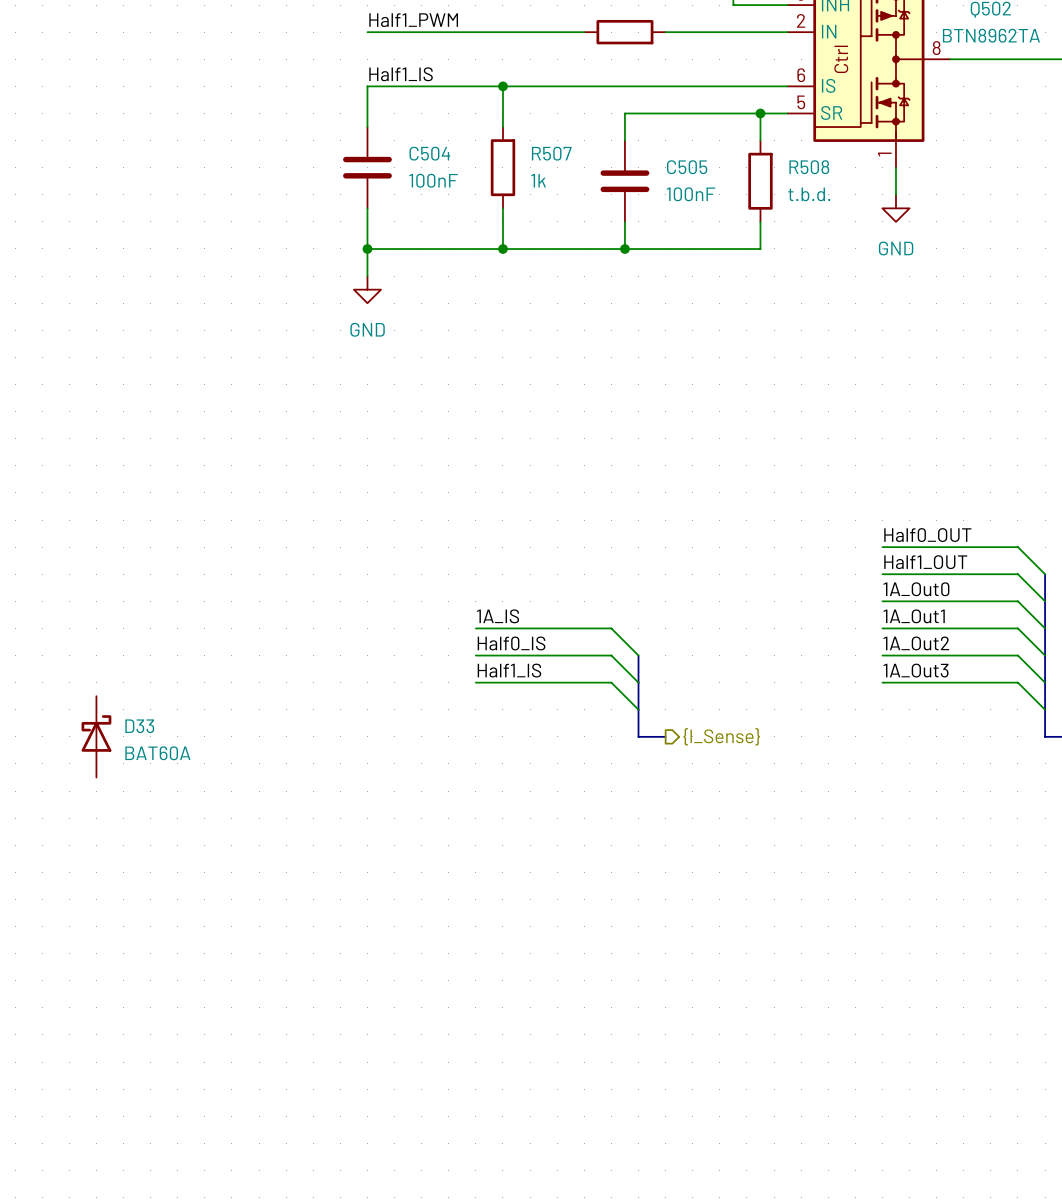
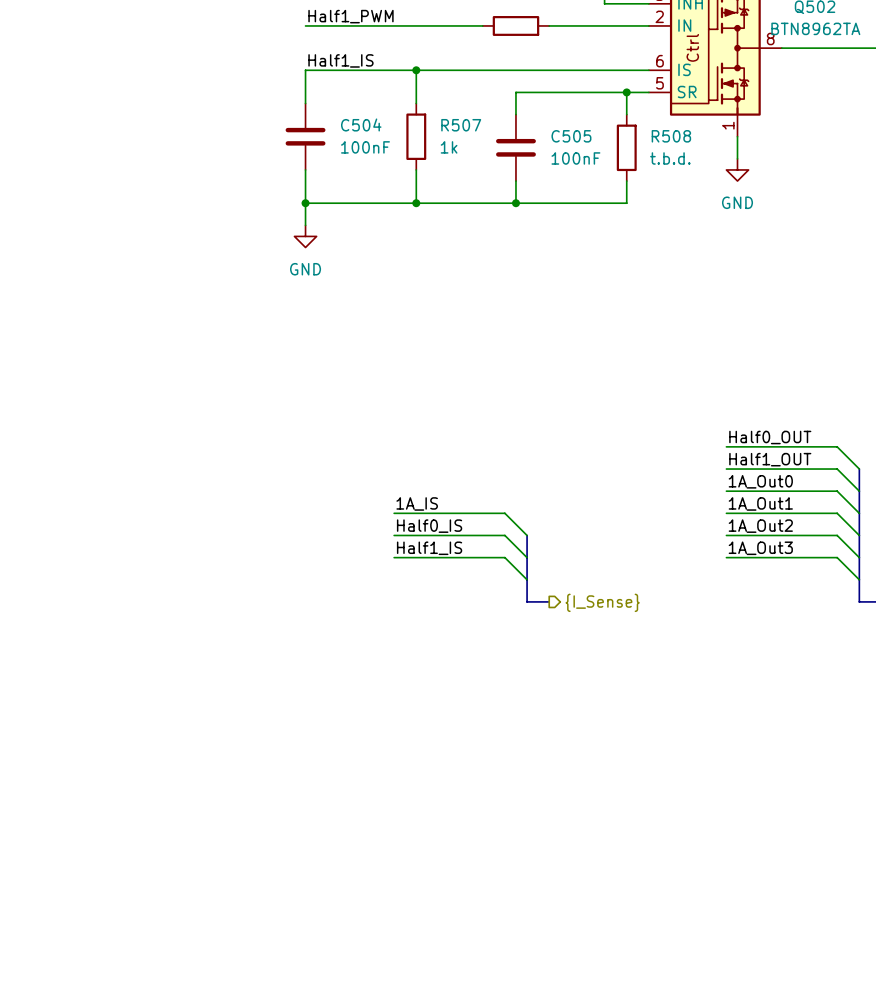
D33: BAT60A (96, 736) -> none

